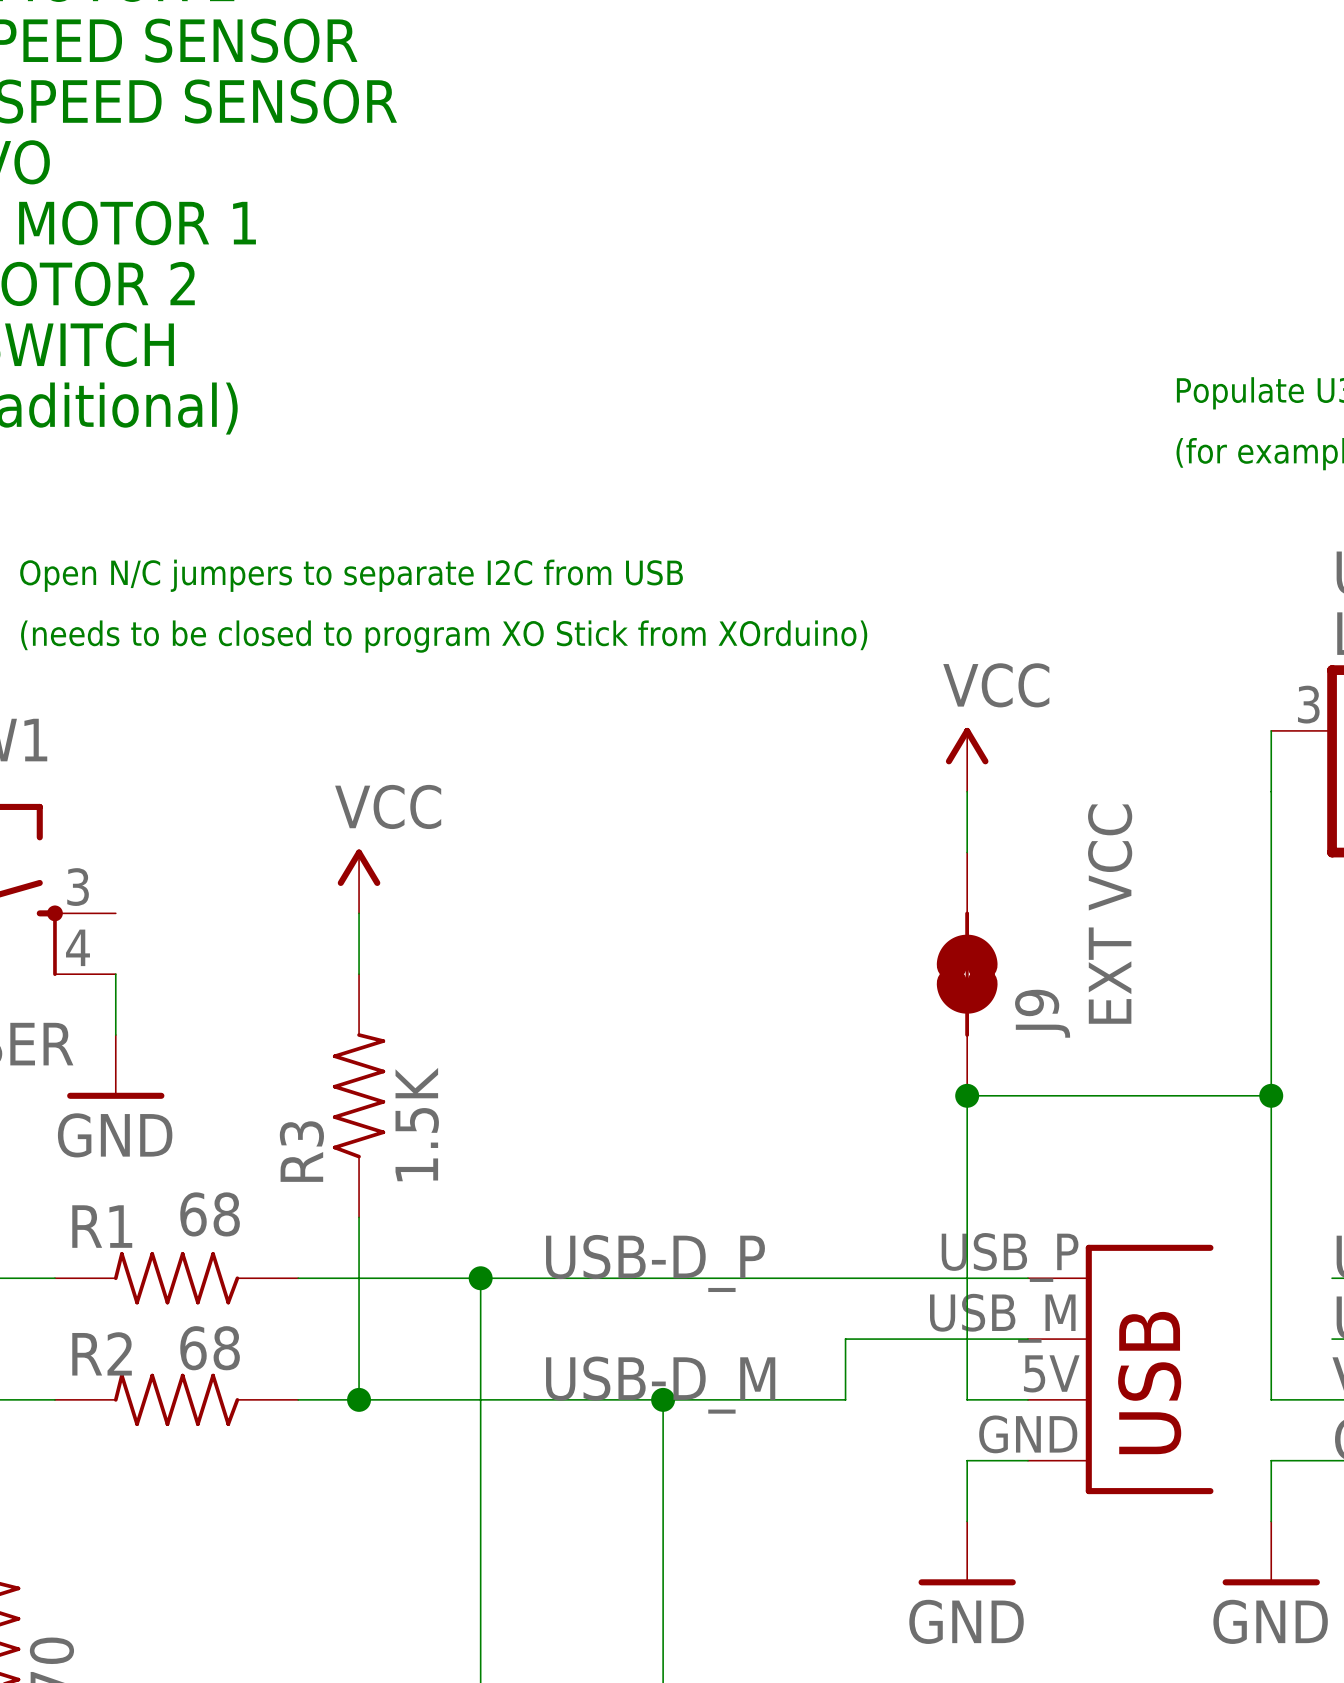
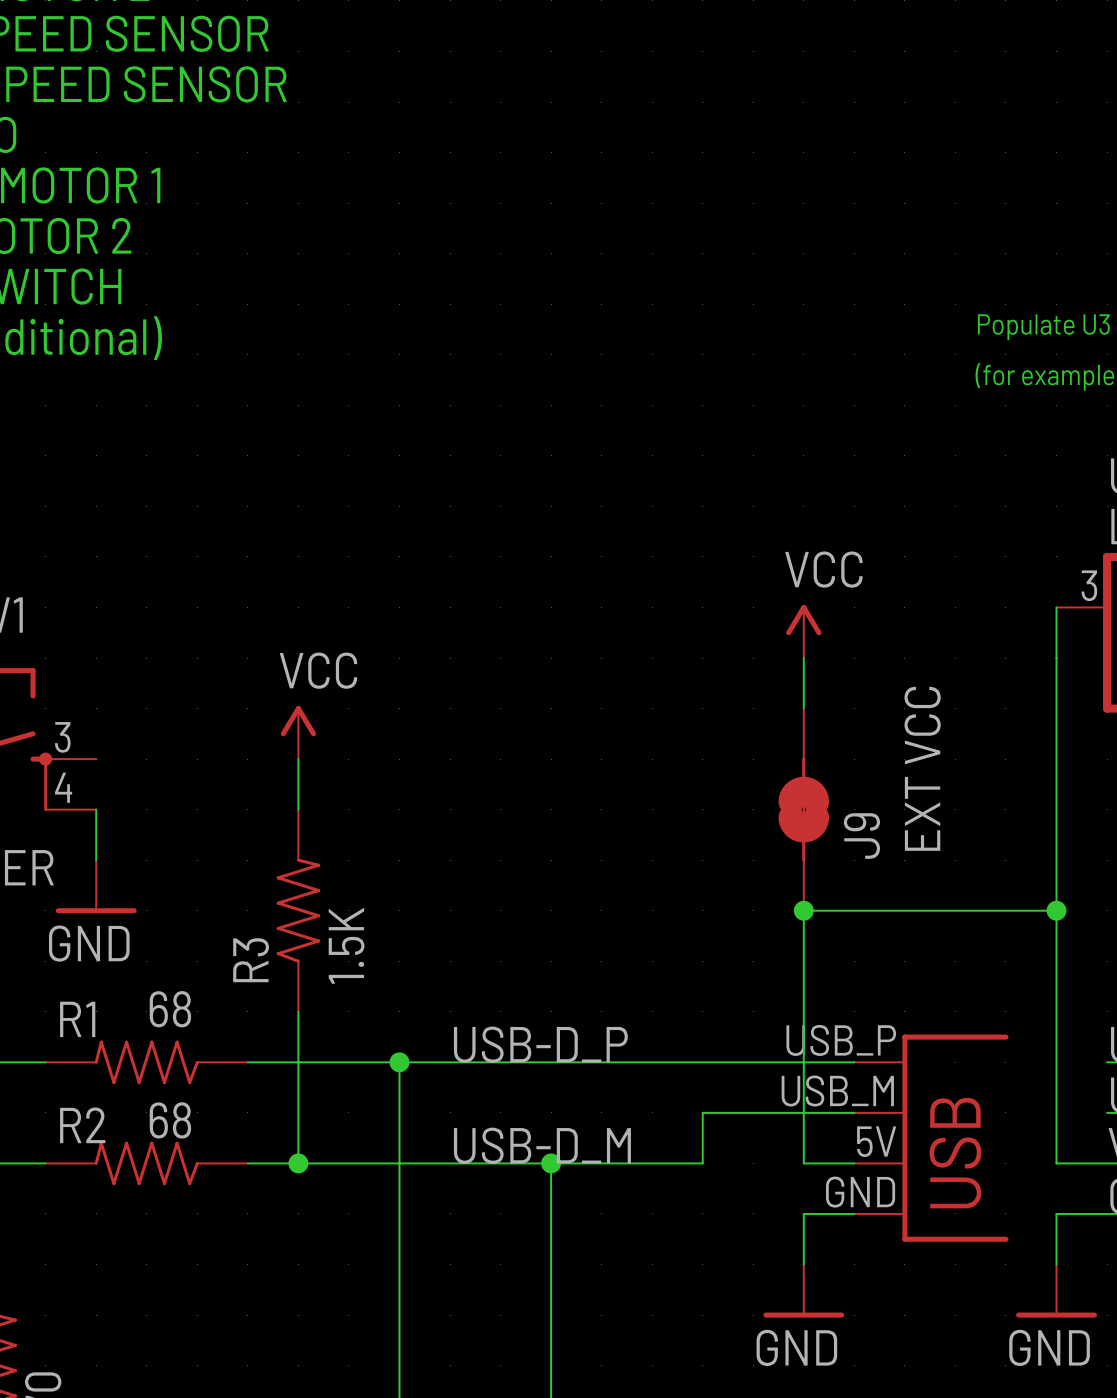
text: Open N/C jumpers to separate I2C from USB (351, 575) -> none
text: (needs to be closed to program XO Stick from XOrduino) (444, 636) -> none

